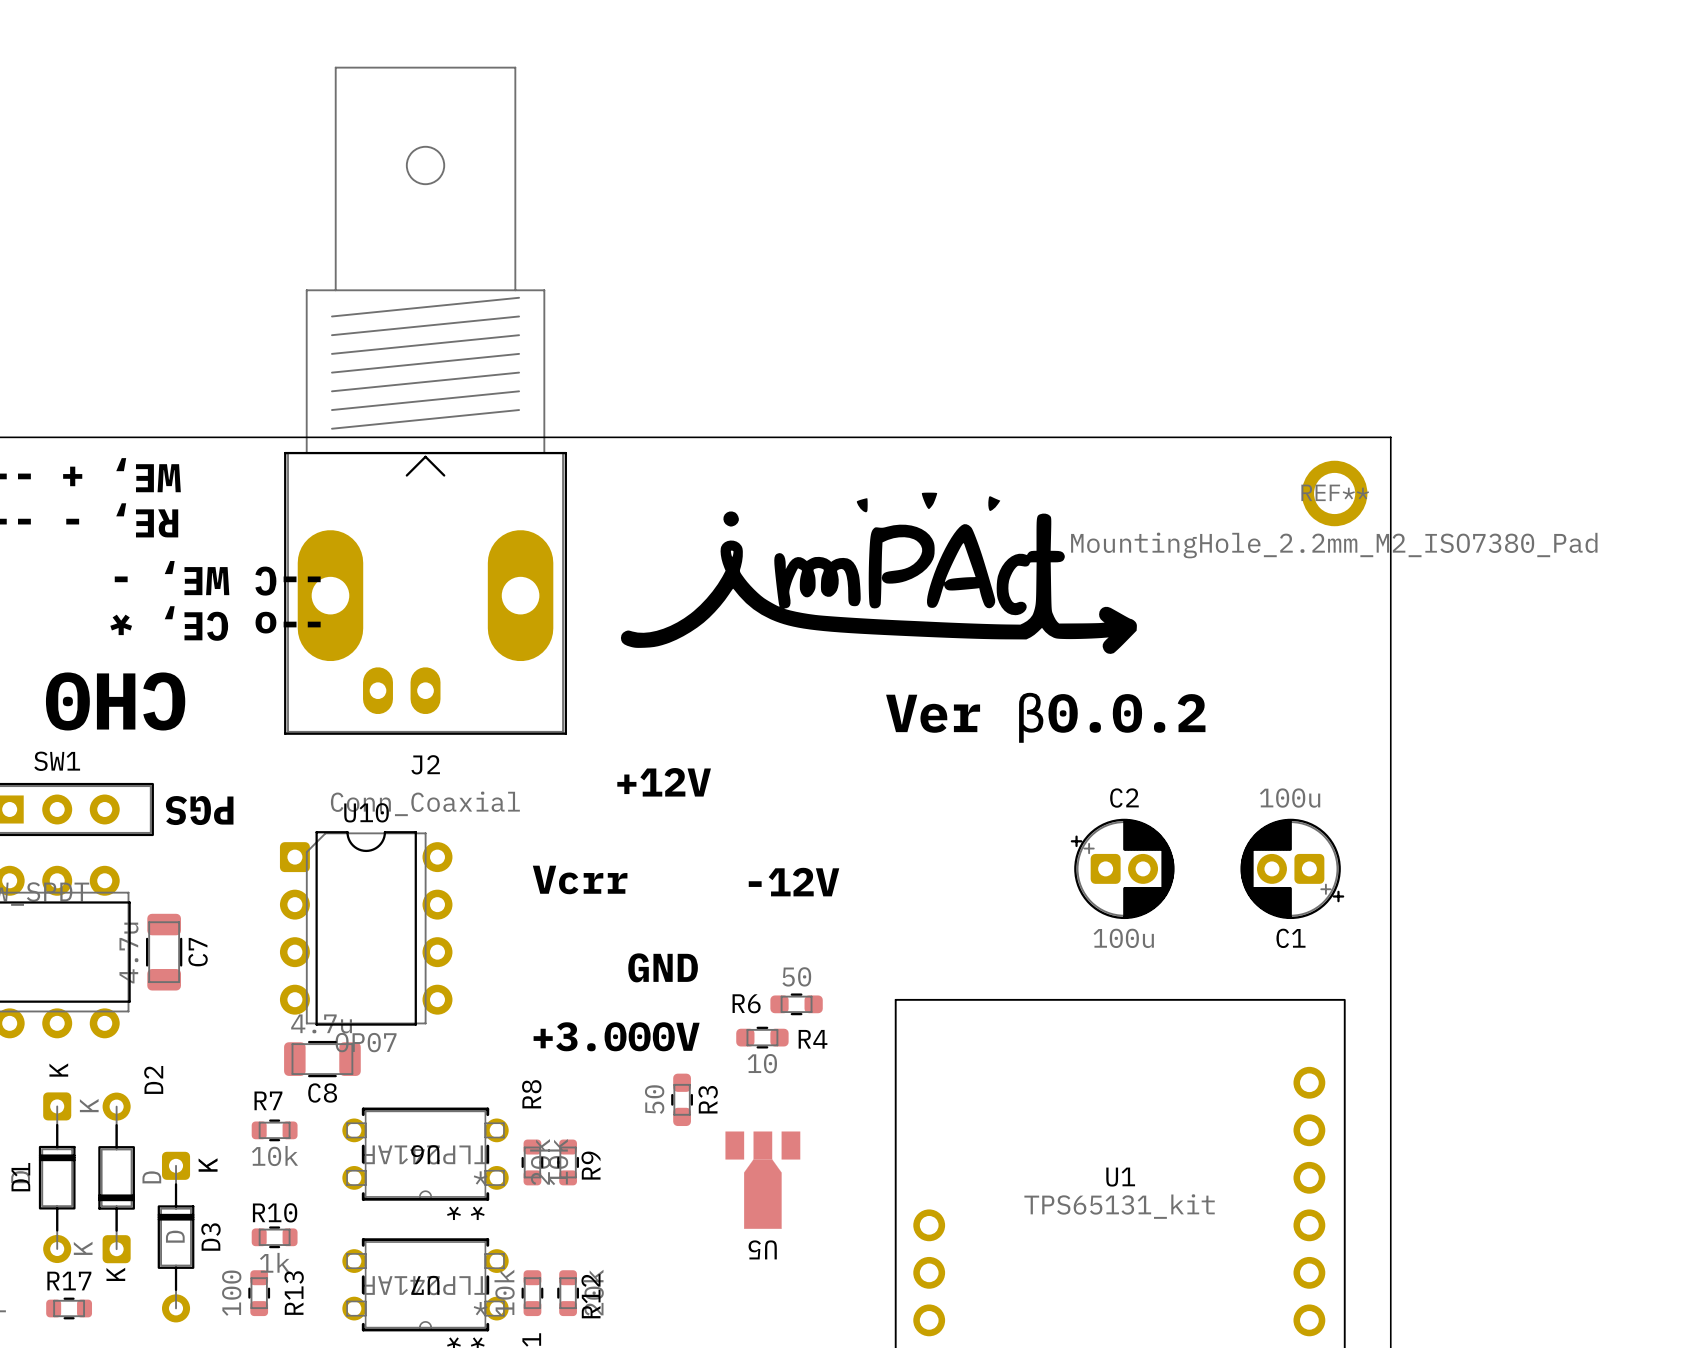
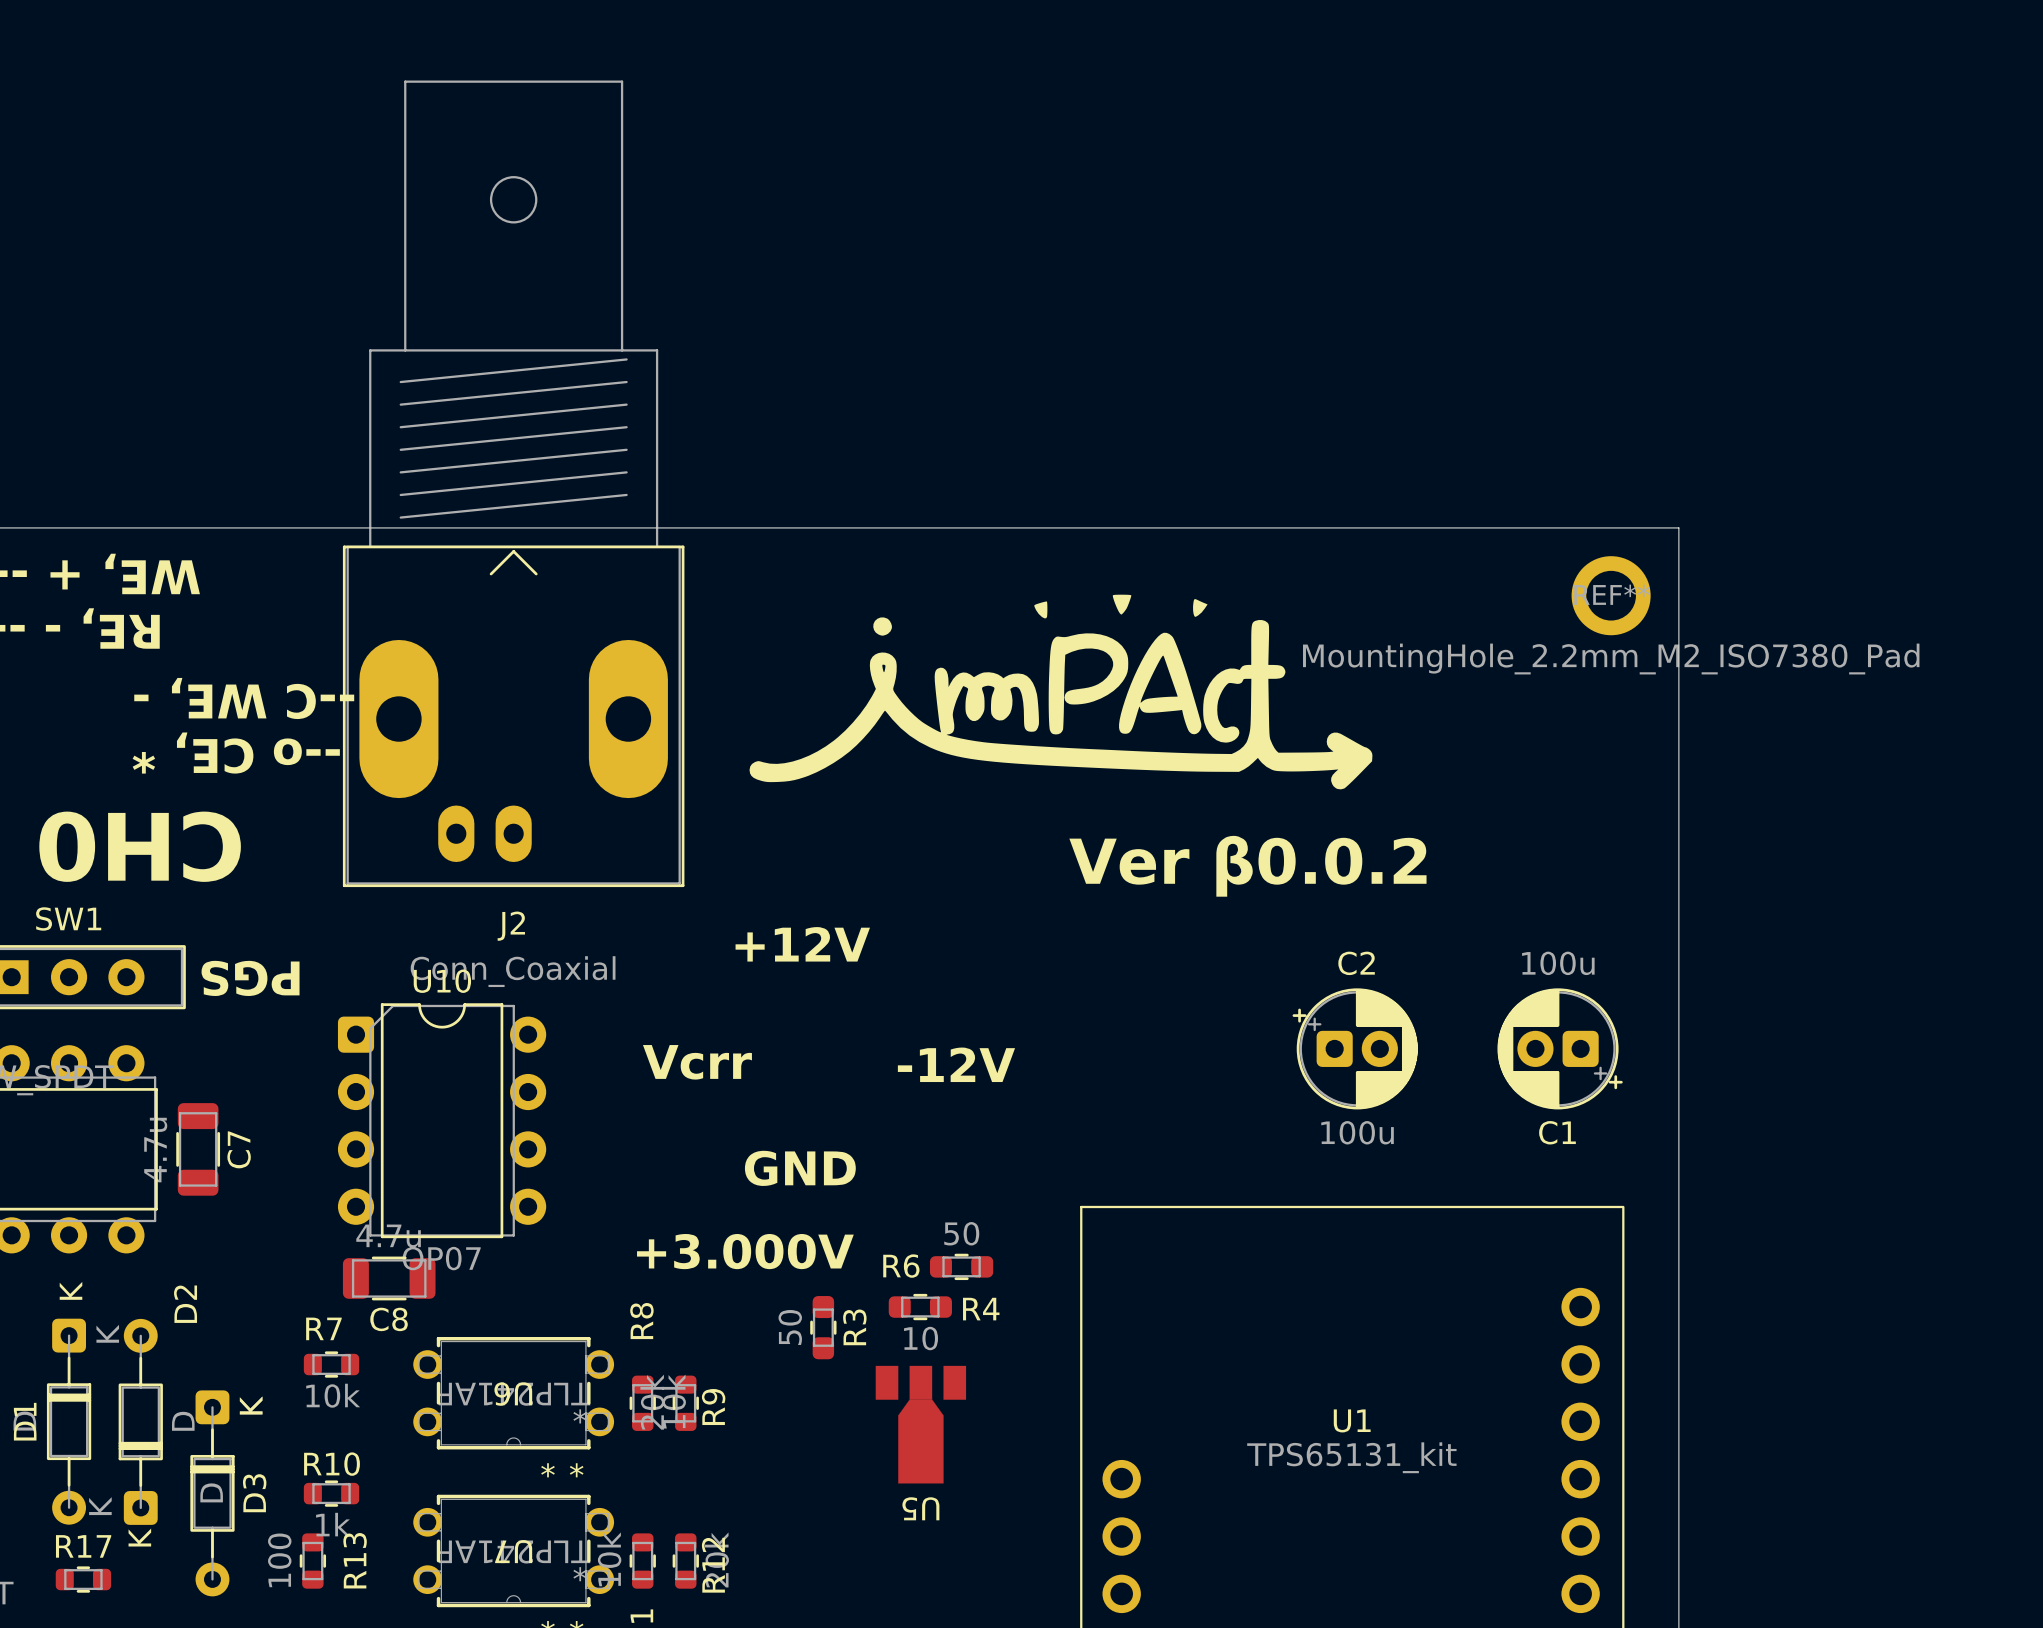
R6 position: (796, 1004) -> (961, 1266)
R4 position: (762, 1037) -> (920, 1307)

